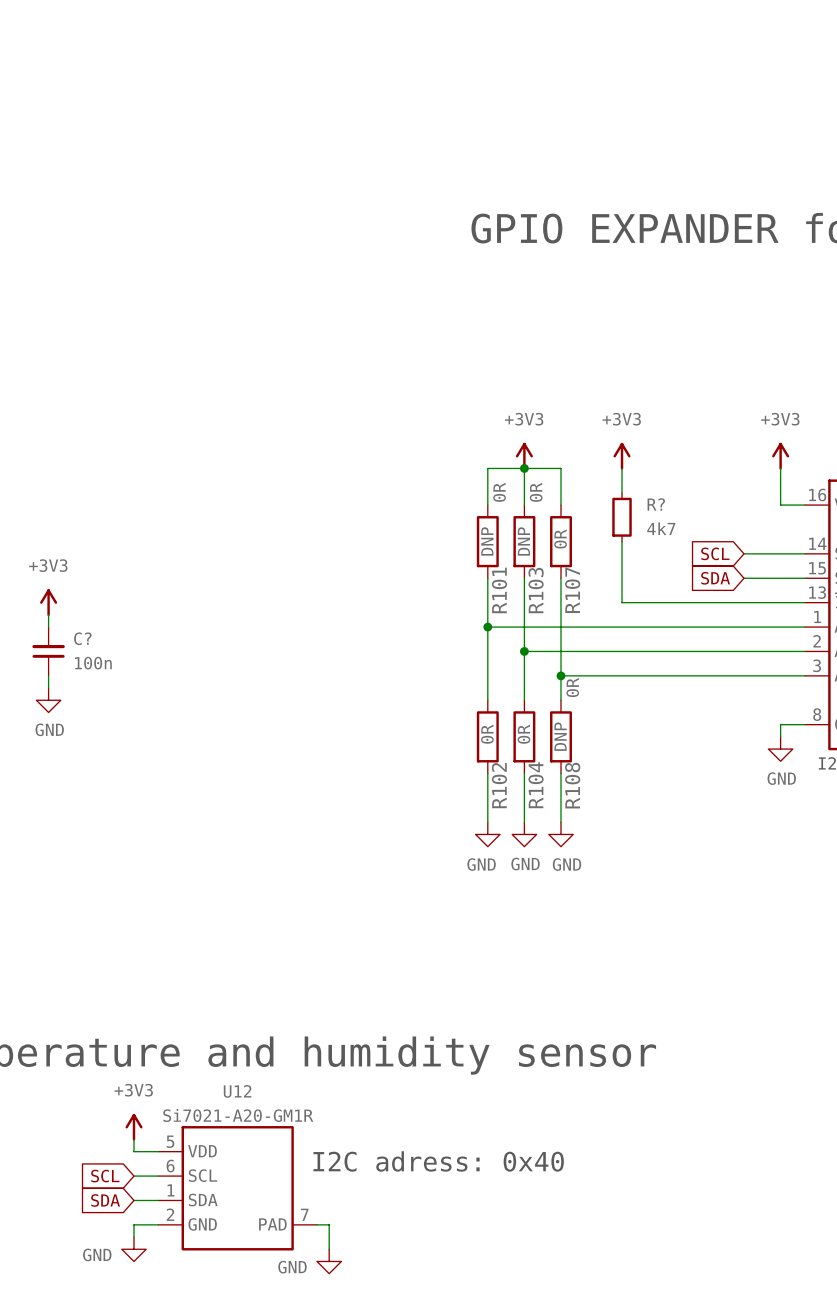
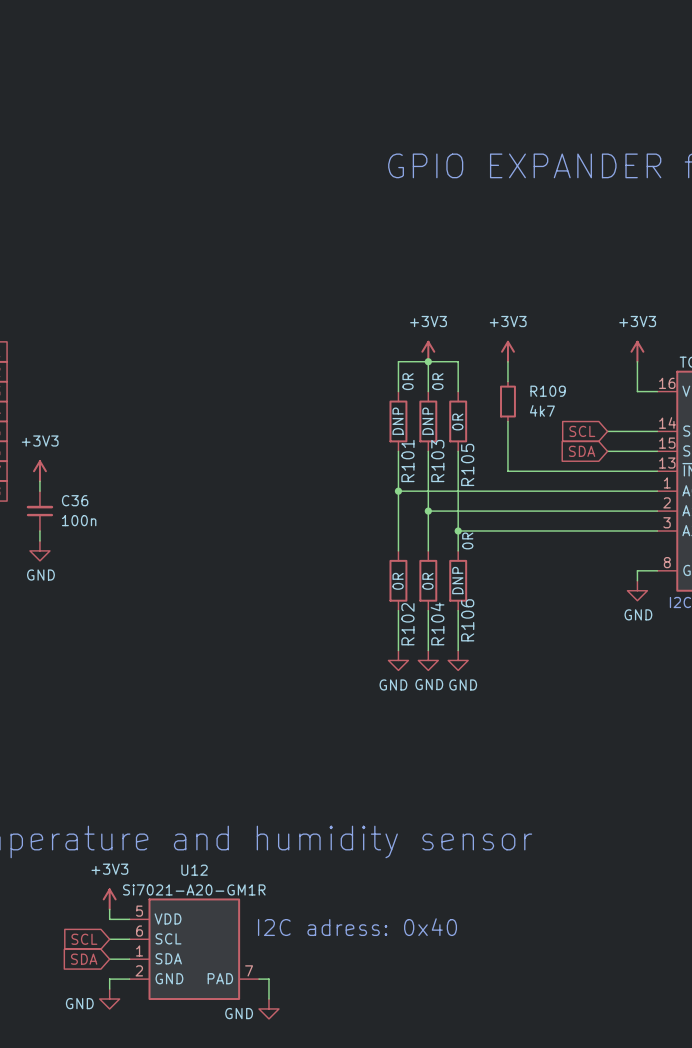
R? name: R? (656, 504) -> R109 (548, 391)
R107 name: R107 (572, 590) -> R105 (467, 464)
C? name: C? (82, 638) -> C36 (75, 500)
R108 name: R108 (572, 785) -> R106 (467, 620)

